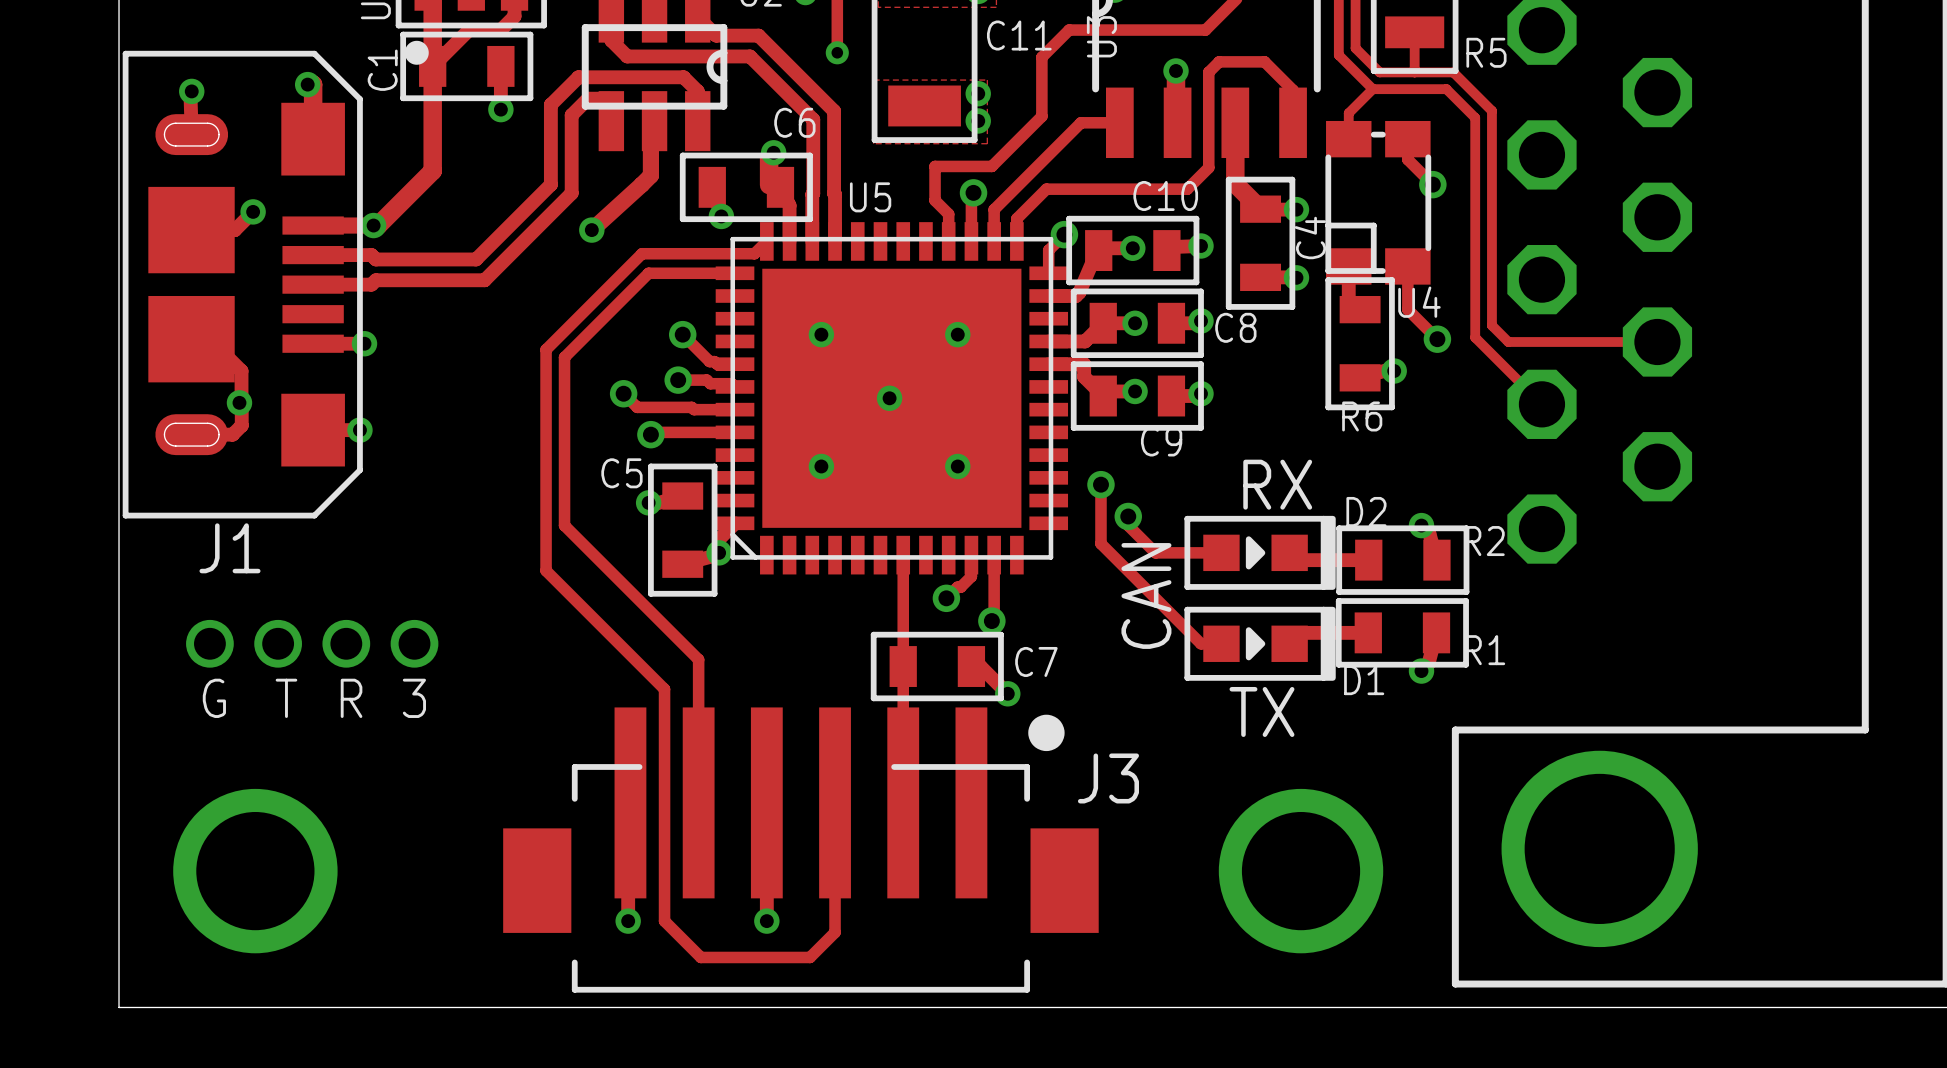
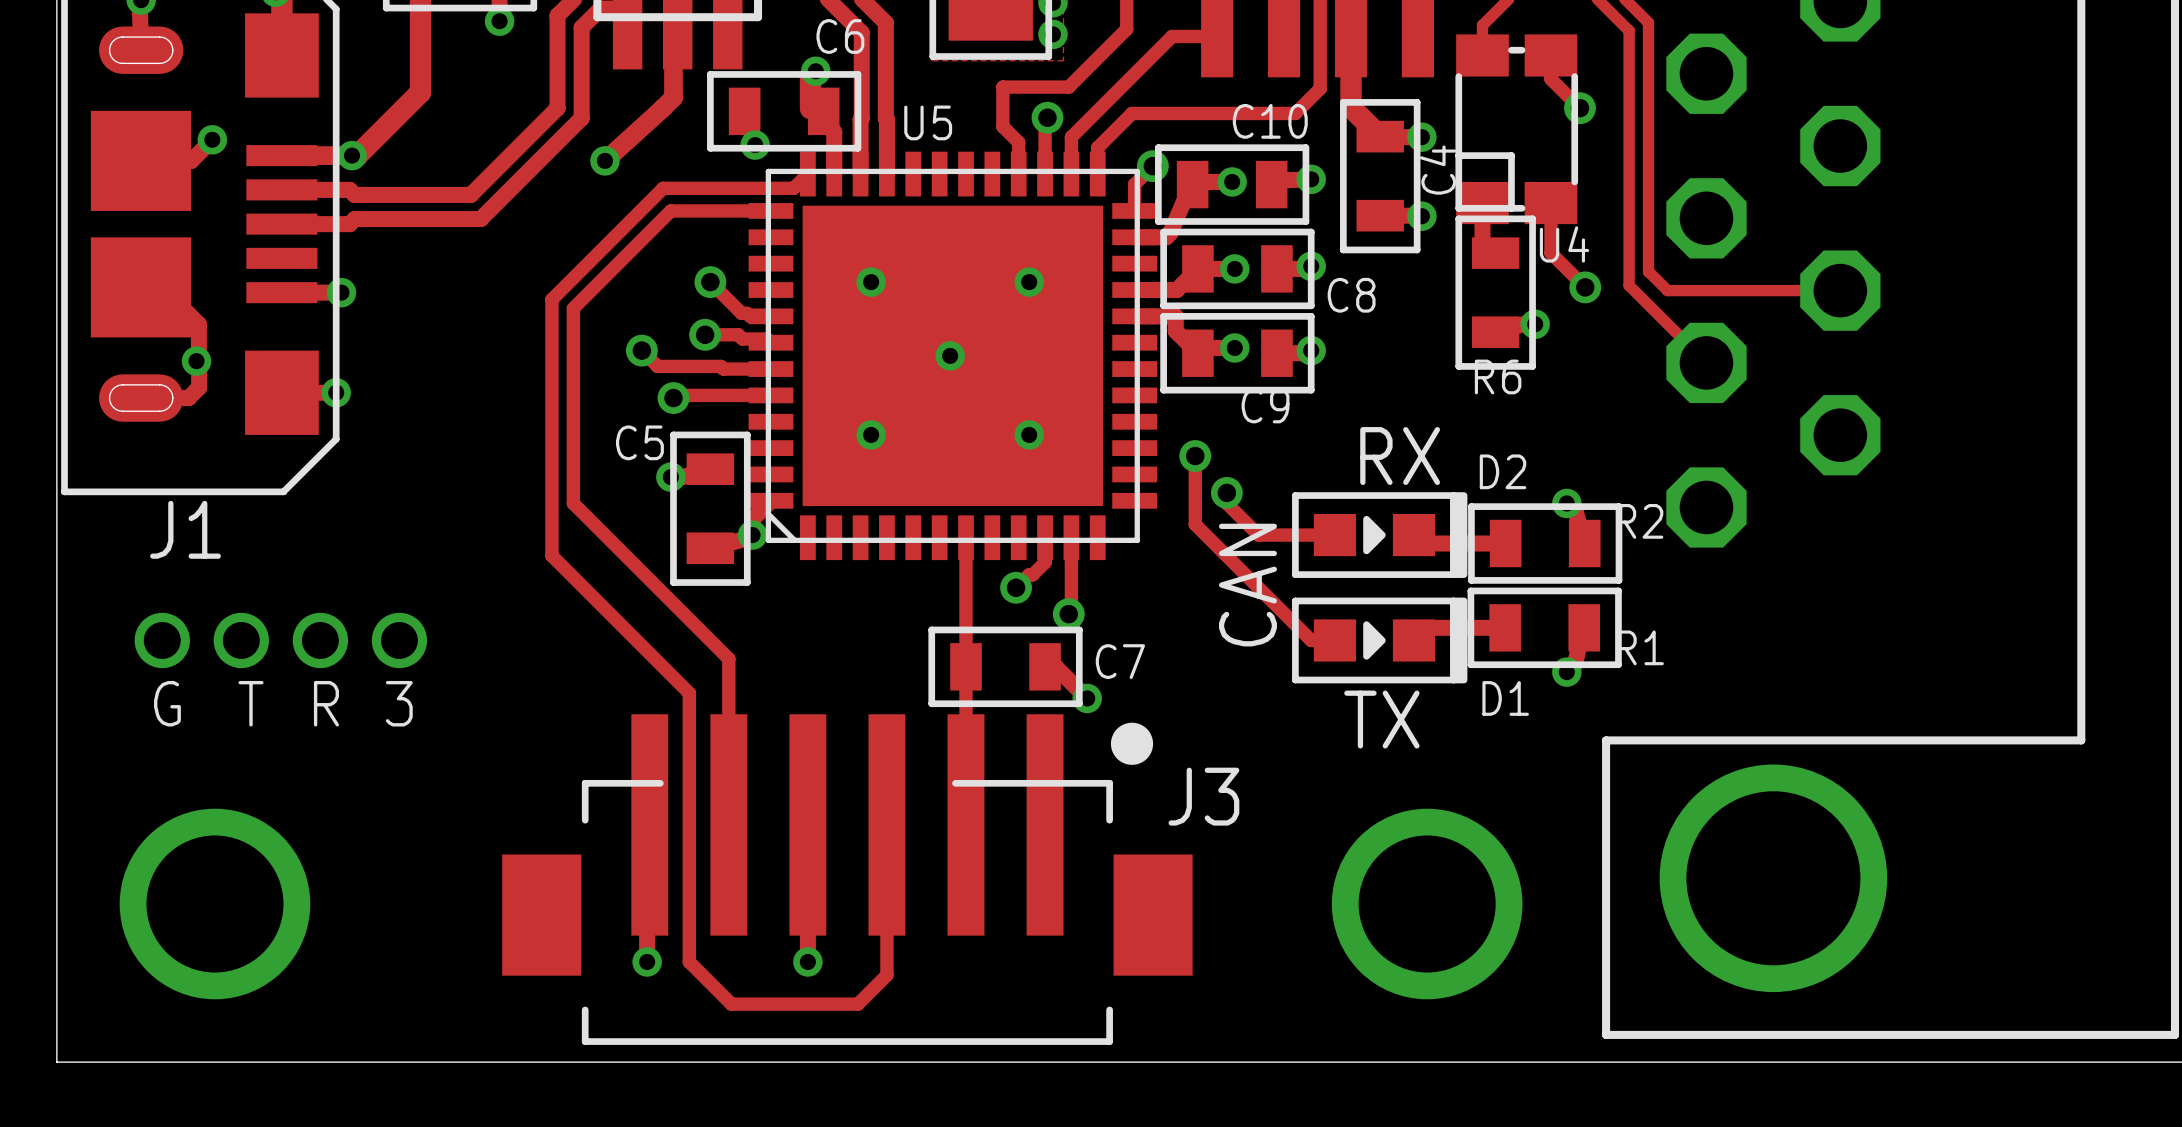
C8 name position: C8 (1235, 327) -> C8 (1351, 295)
D2 name position: D2 (1366, 511) -> D2 (1503, 471)
D1 name position: D1 (1364, 680) -> D1 (1505, 698)

